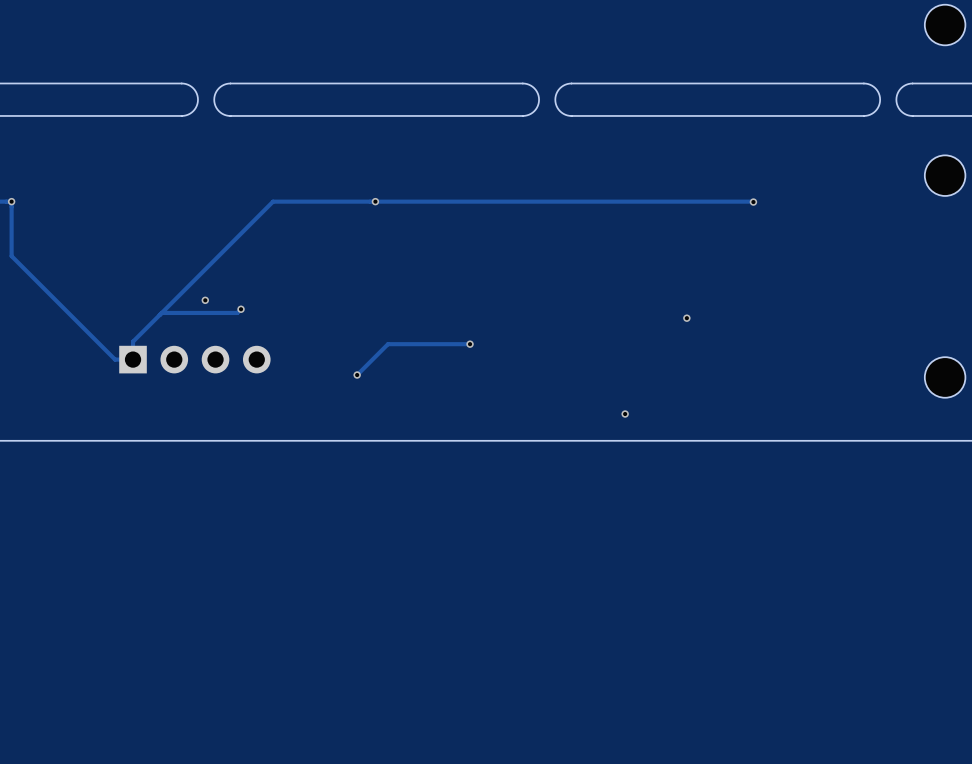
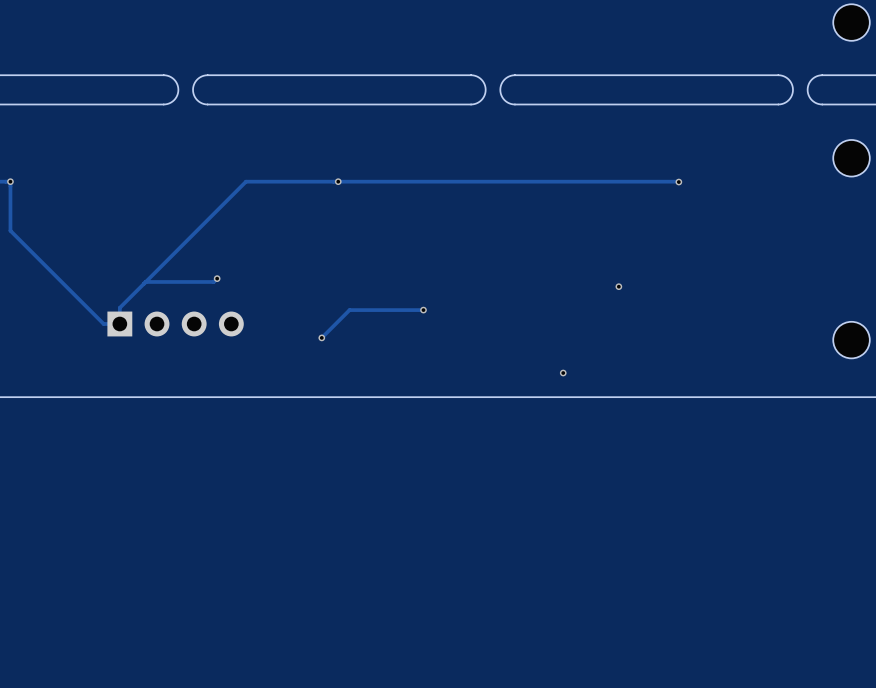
via: (205, 300) -> none

